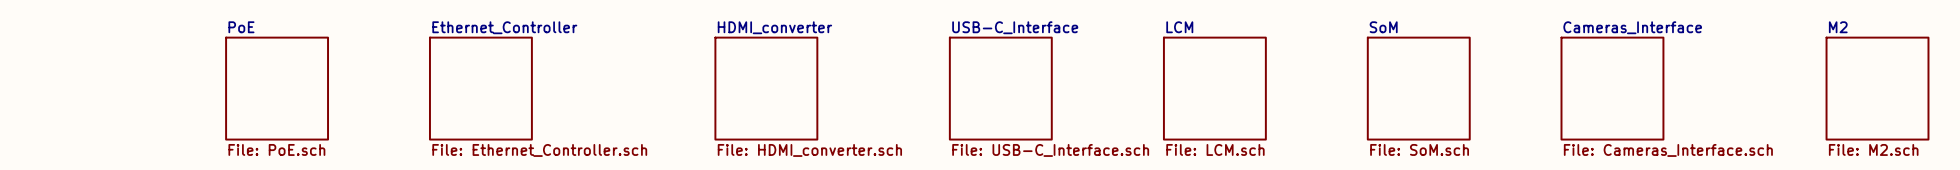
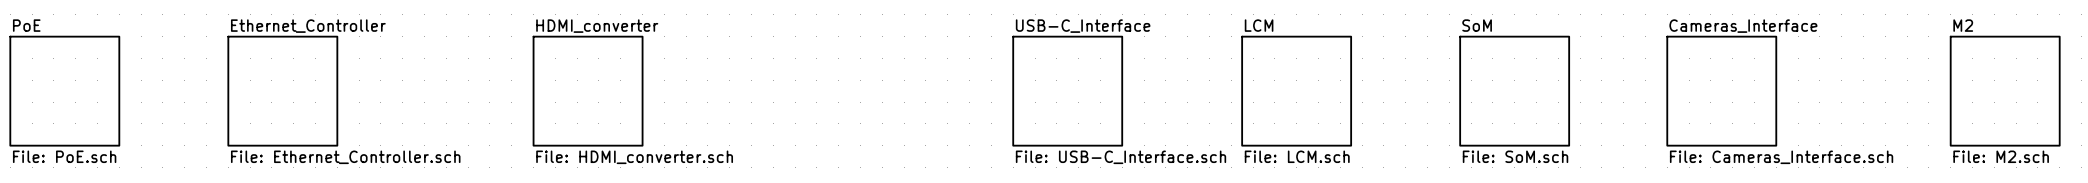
sheet PoE: none -> File: PoE.sch (64, 91)
sheet Ethernet_Controller: none -> File: Ethernet_Controller.sch (282, 91)
sheet PoE: File: PoE.sch (277, 88) -> none
sheet Ethernet_Controller: File: Ethernet_Controller.sch (480, 88) -> none
sheet HDMI_converter: none -> File: HDMI_converter.sch (588, 91)
sheet HDMI_converter: File: HDMI_converter.sch (766, 88) -> none

